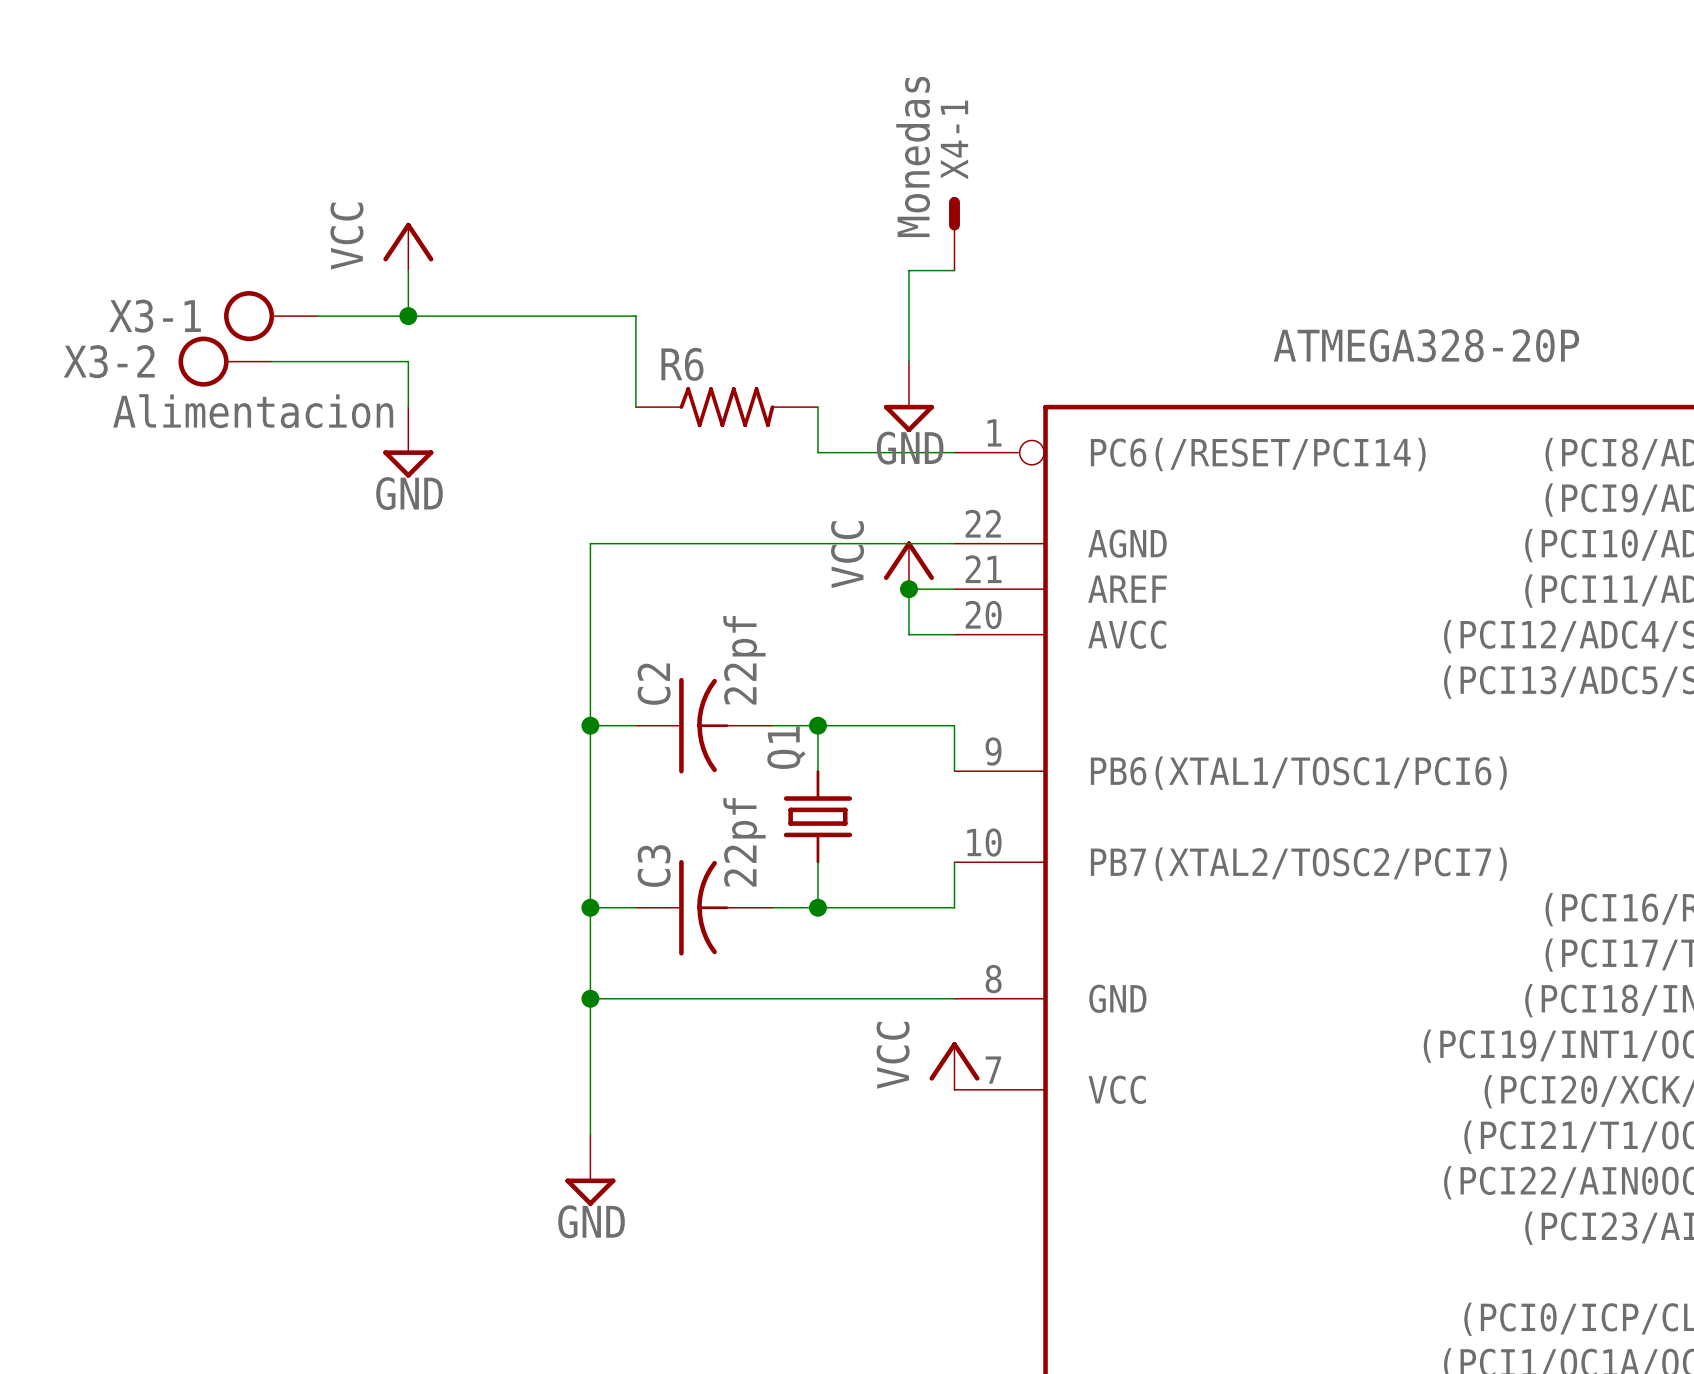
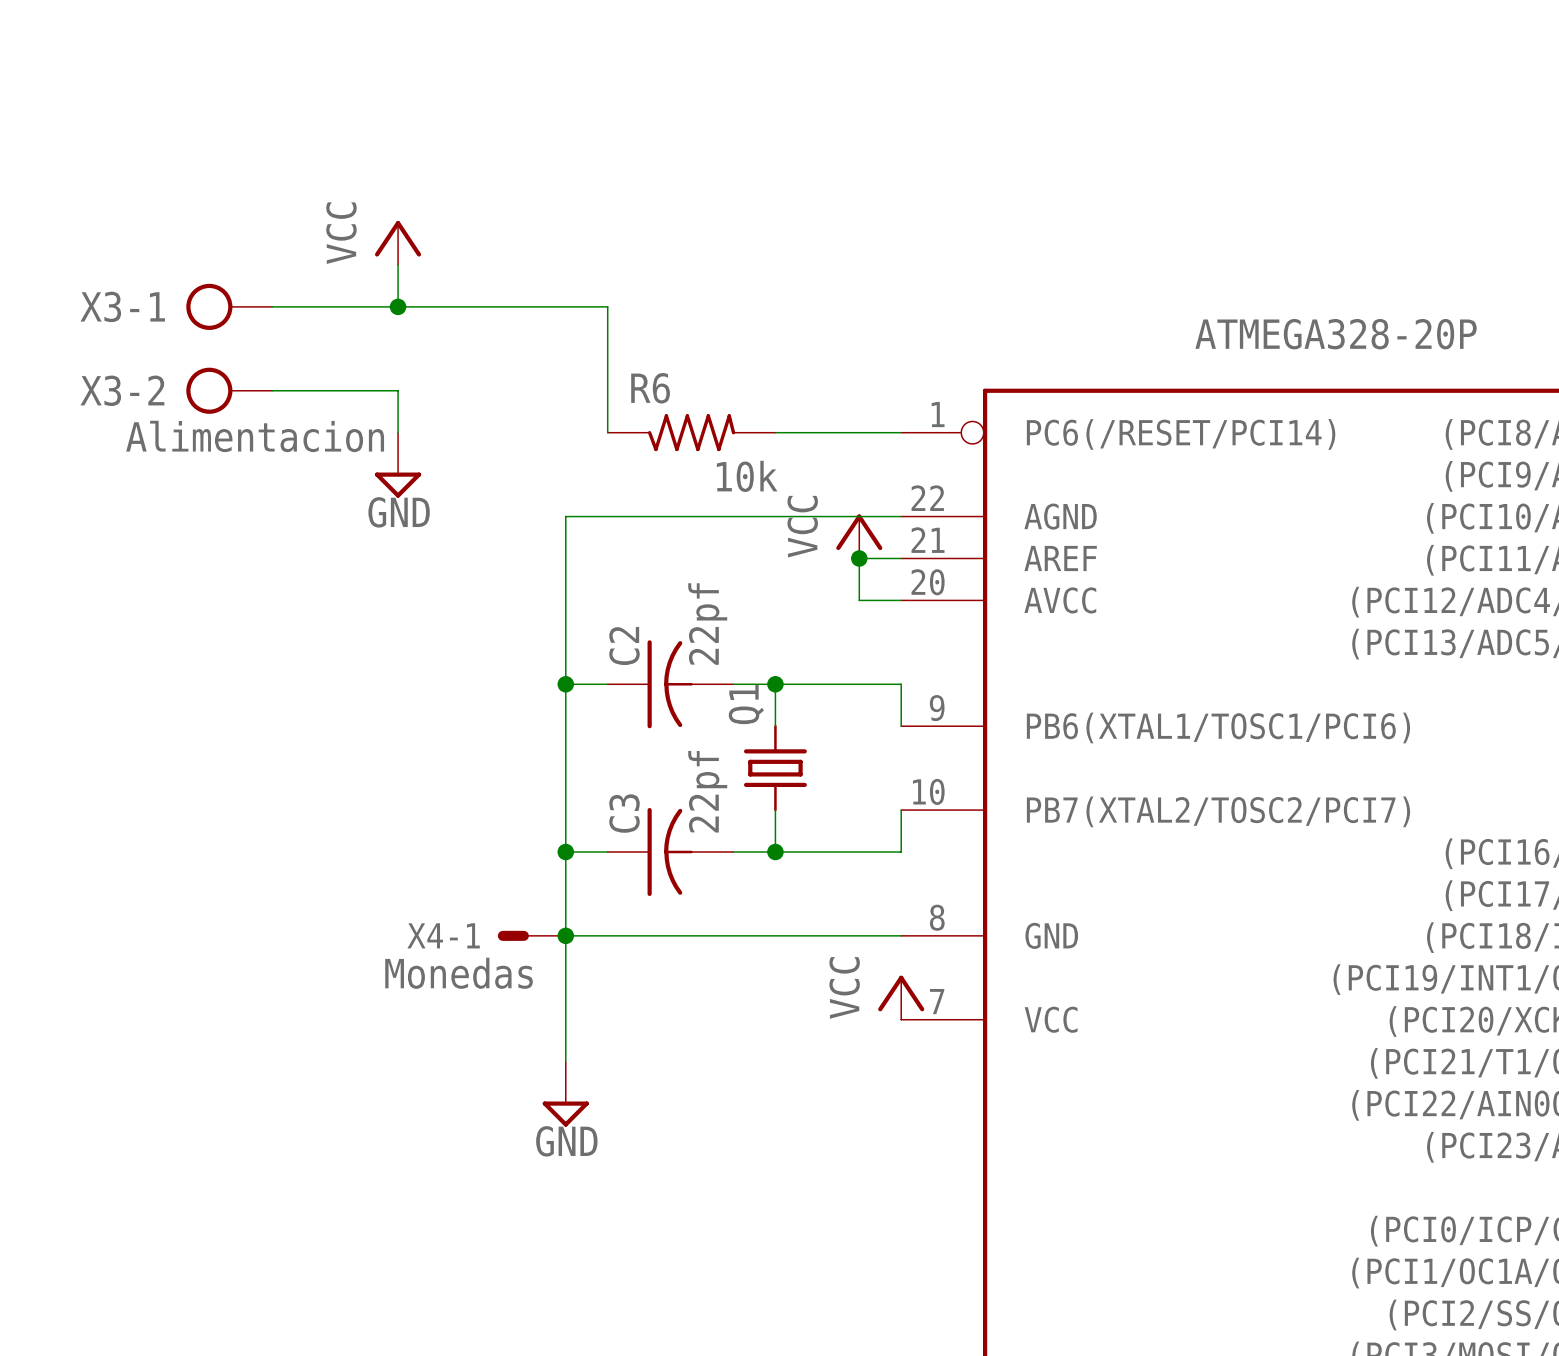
X4-1 rotation: 0° (954, 213) -> 90° counterclockwise (513, 935)
X4-1 position: (954, 233) -> (531, 935)
wire: (954, 270) (908, 270) (908, 361) -> none
X3-1 position: (270, 316) -> (229, 306)
X3-2 position: (225, 361) -> (229, 390)
wire: (271, 361) (408, 361) (408, 407) -> (272, 390) (398, 390) (398, 432)
power symbol: GND (908, 396) -> none
R6 flip: as is (726, 407) -> up-down (691, 432)
wire: (817, 407) (817, 452) -> (607, 390) (607, 432)
power symbol position: GND (408, 442) -> GND (398, 465)
R6 value: none -> 10k (747, 476)

